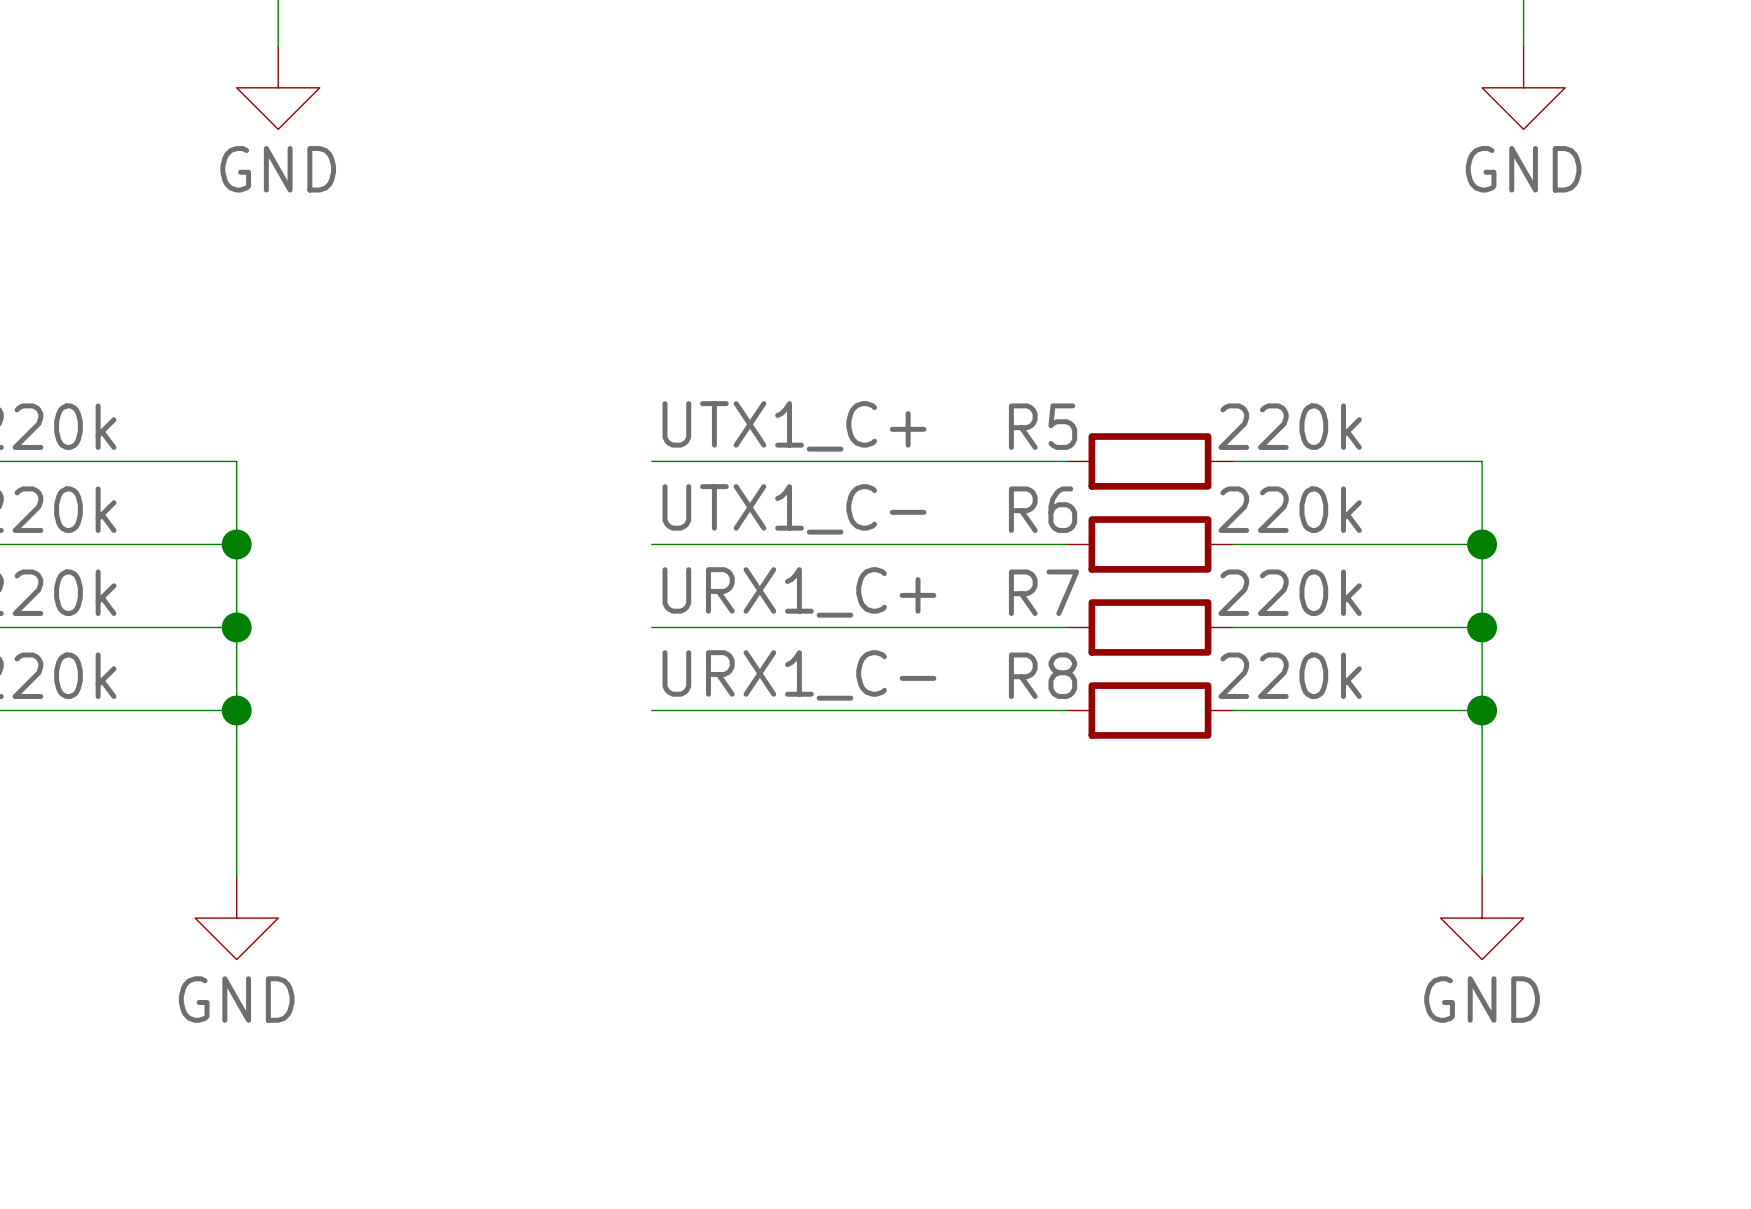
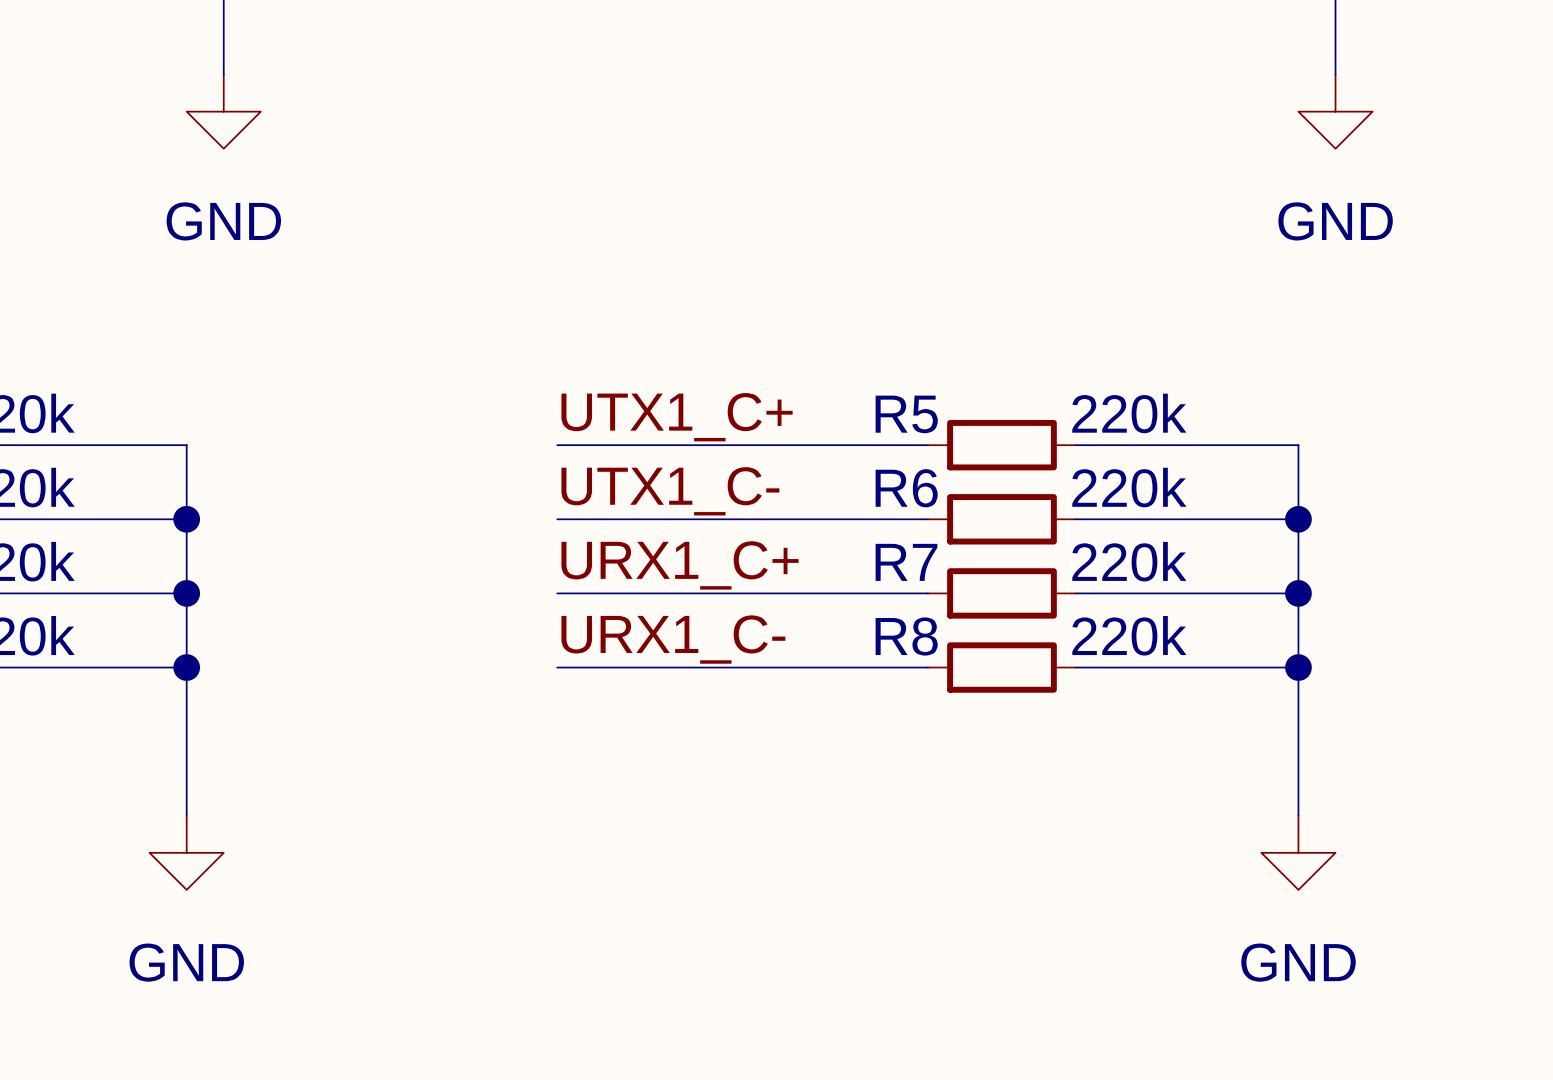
power symbol text position: GND (278, 169) -> GND (223, 221)
power symbol text position: GND (1523, 169) -> GND (1335, 221)
power symbol text position: GND (236, 999) -> GND (186, 962)
power symbol text position: GND (1482, 999) -> GND (1298, 962)

